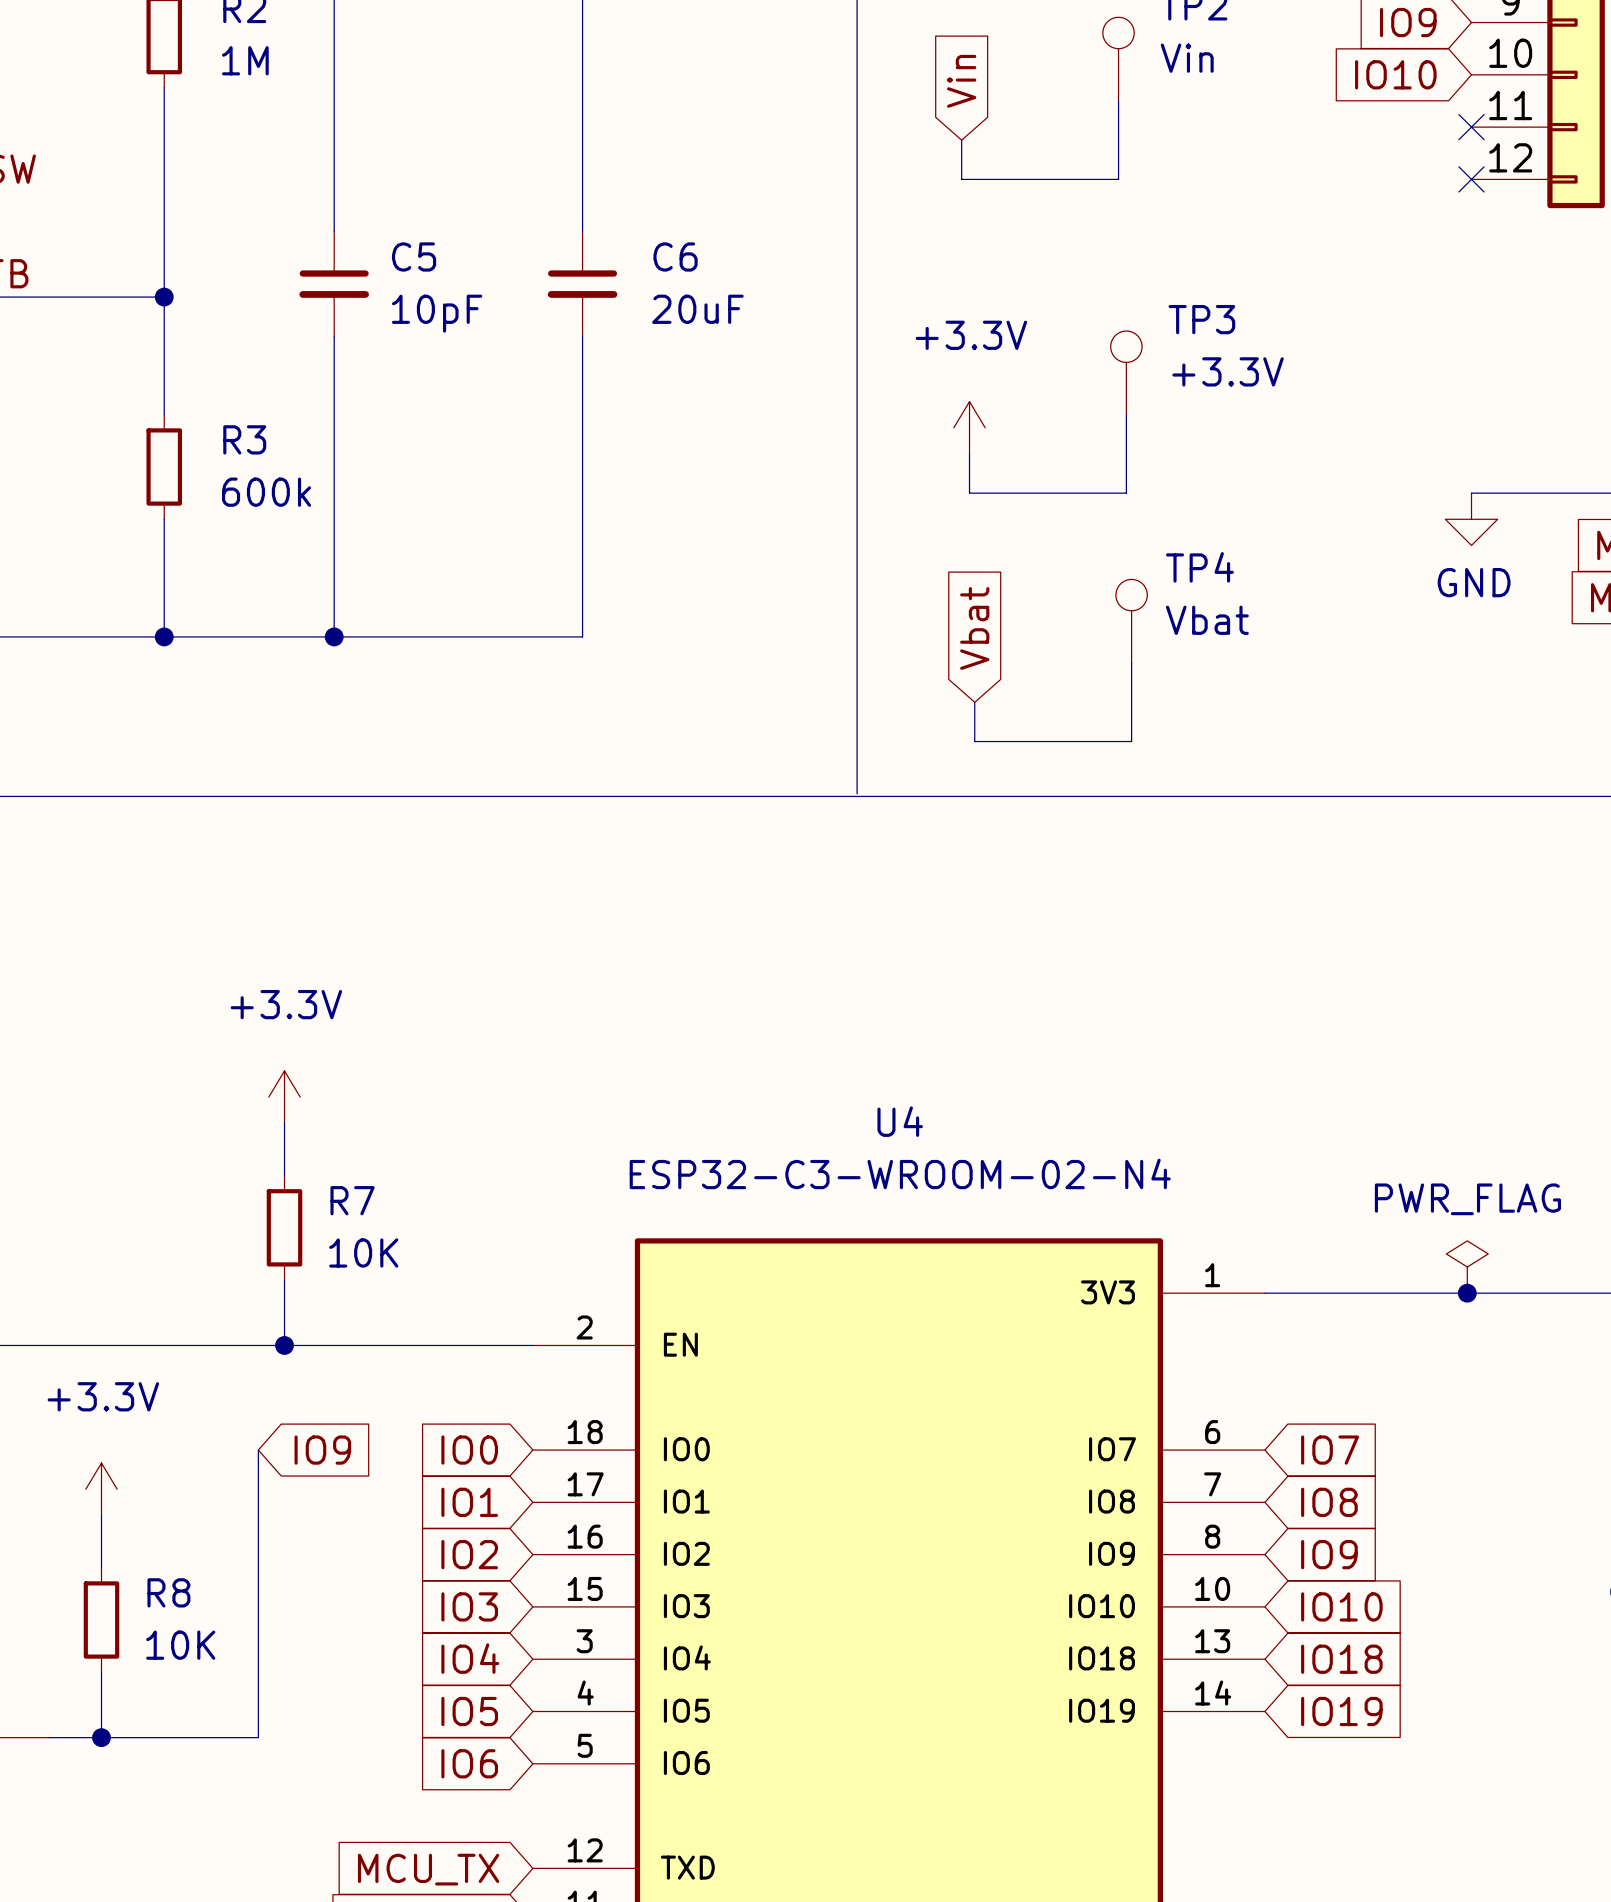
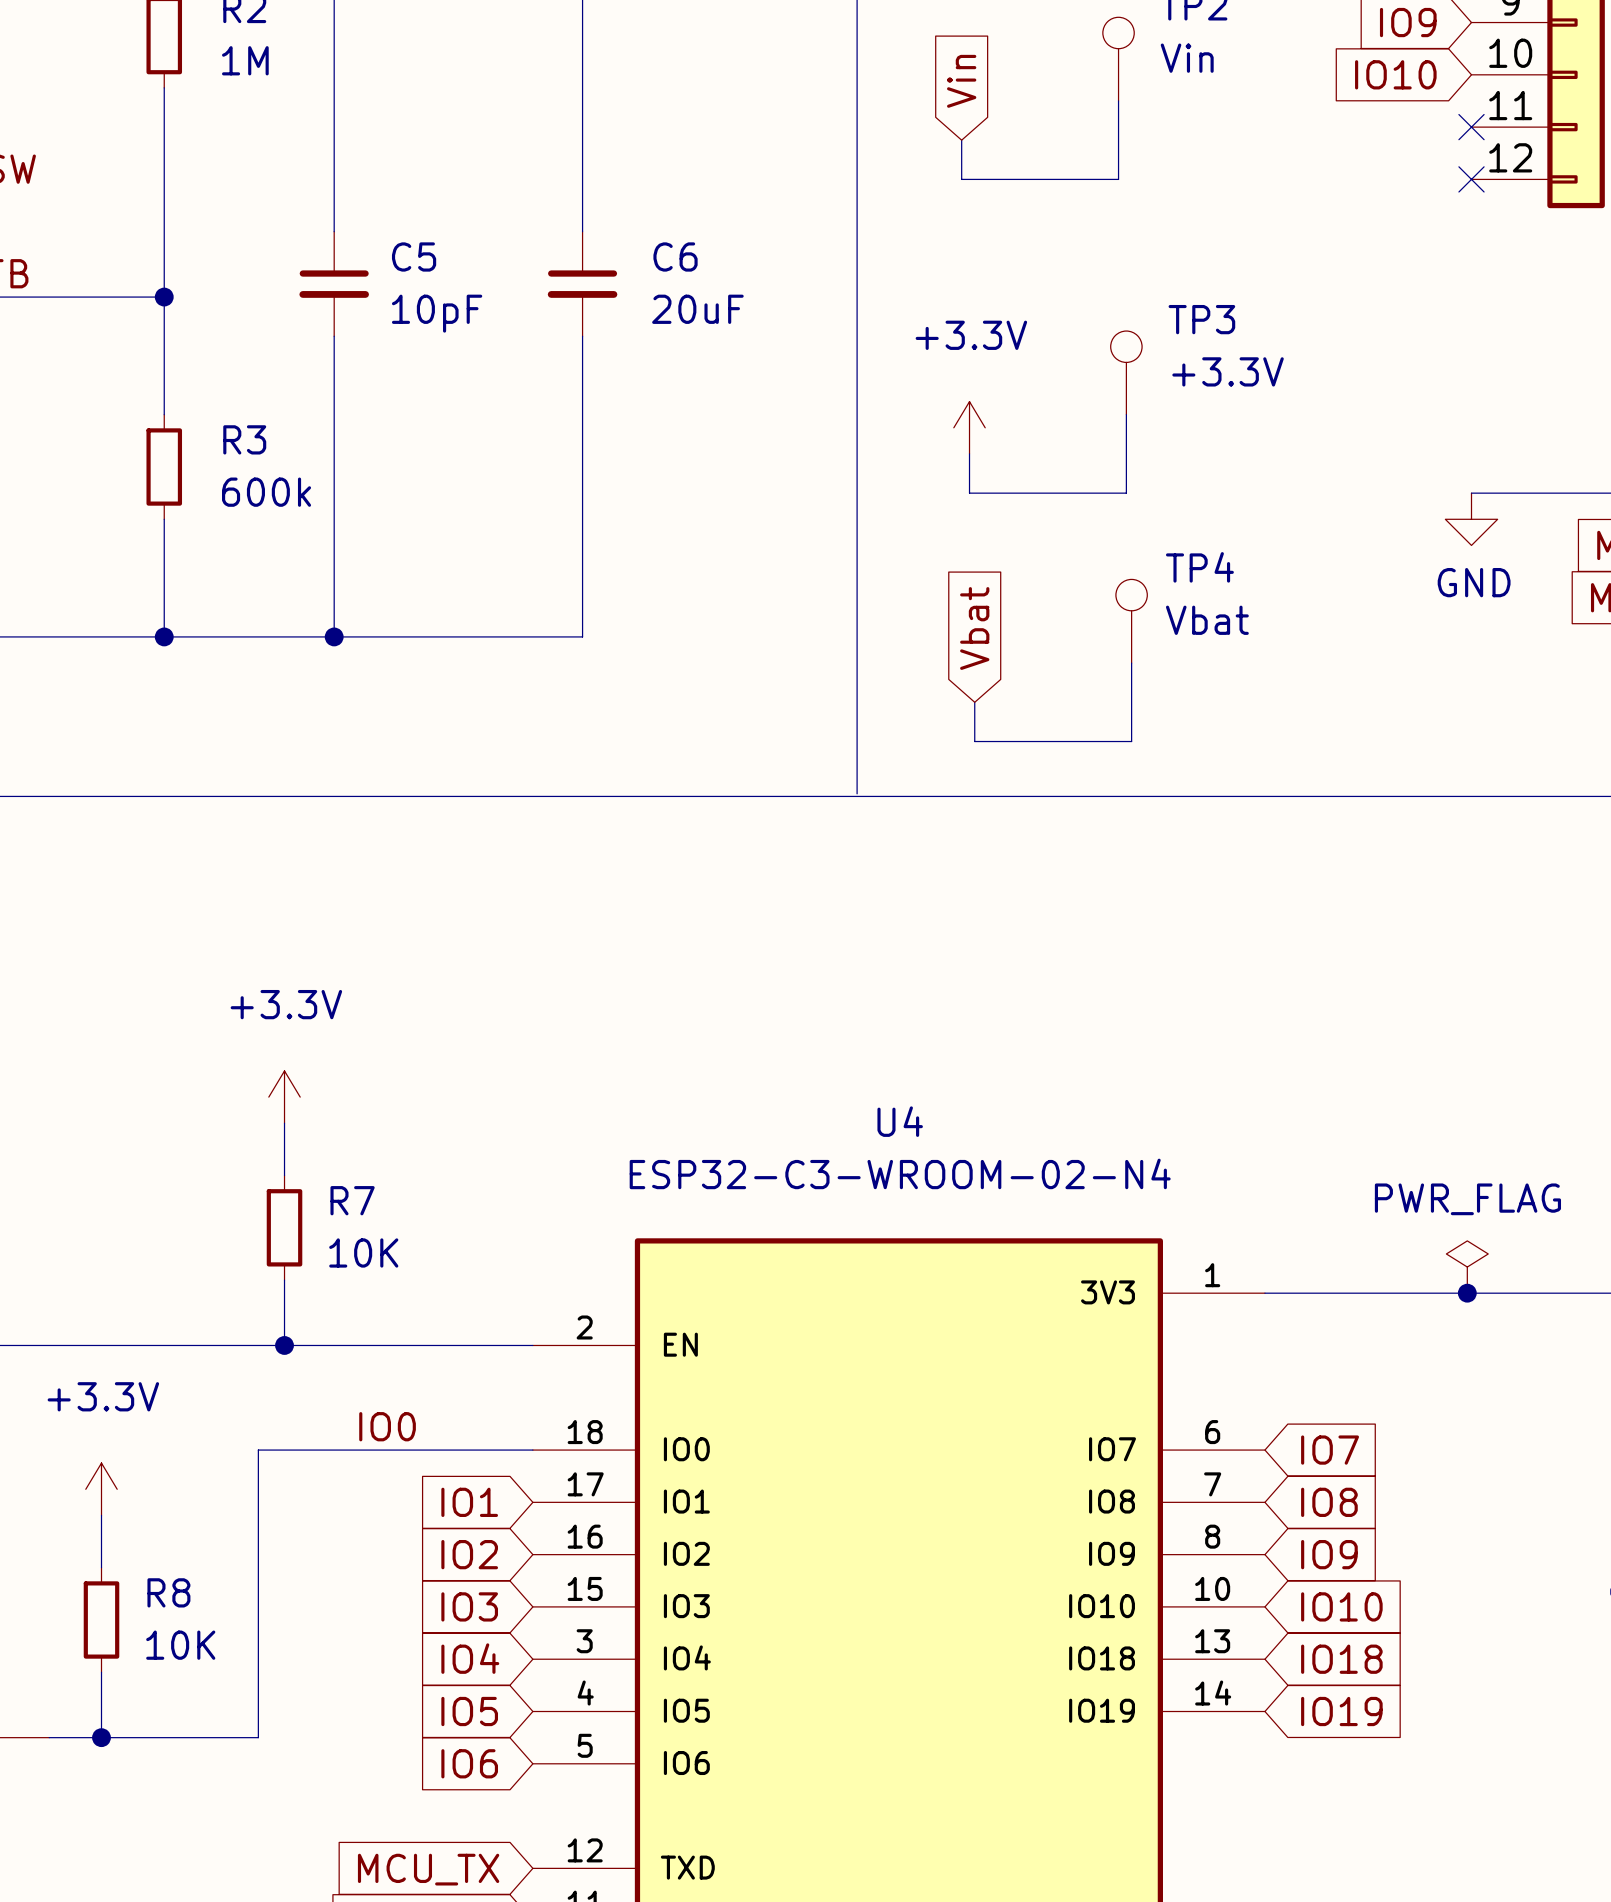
label: none -> IO0 (387, 1426)
wire: none -> (258, 1450) (532, 1450)
global label: IO9 (322, 1450) -> none
global label: IO0 (469, 1450) -> none

